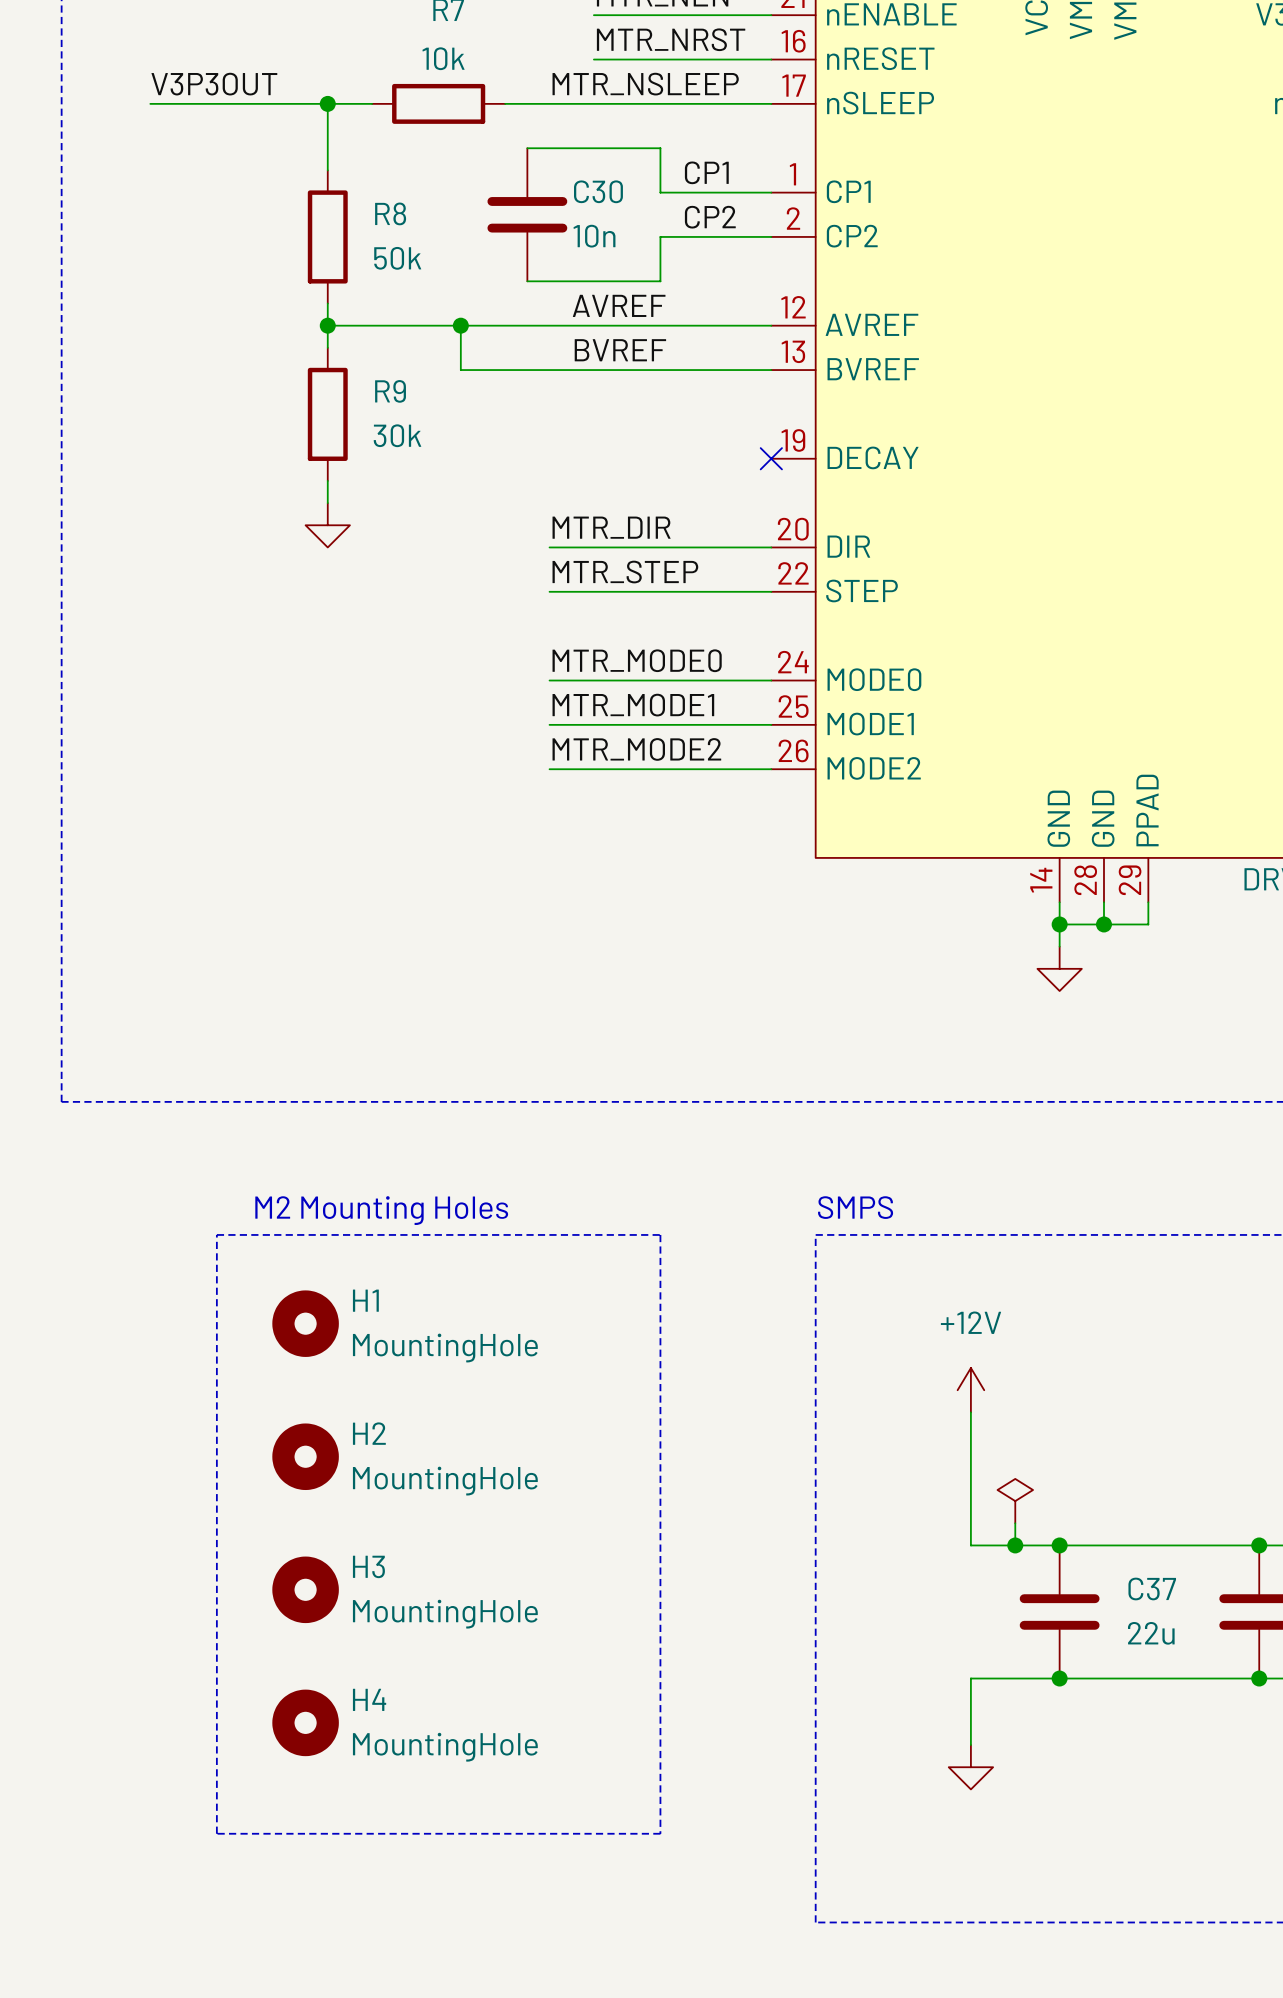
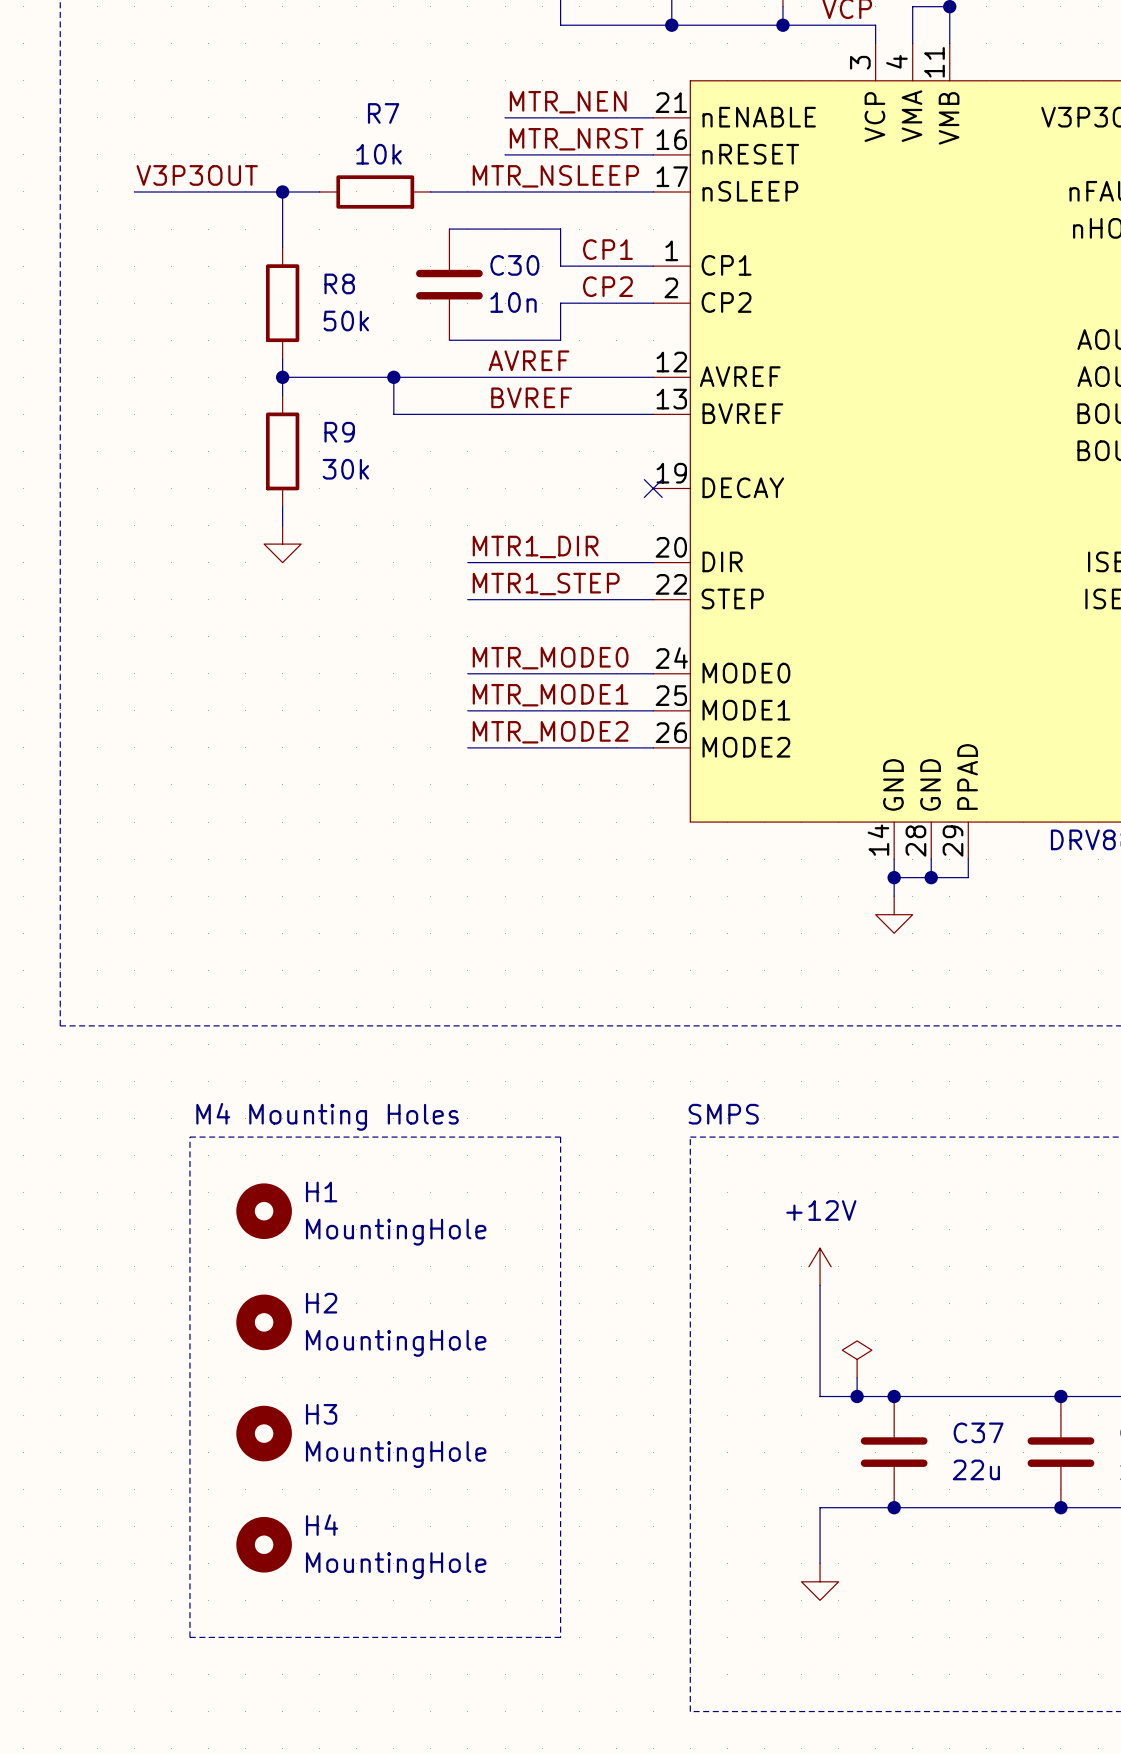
label: MTR_DIR (611, 527) -> MTR1_DIR (535, 546)
label: MTR_STEP (625, 572) -> MTR1_STEP (546, 584)
text: M2 Mounting Holes (381, 1210) -> M4 Mounting Holes (327, 1116)

